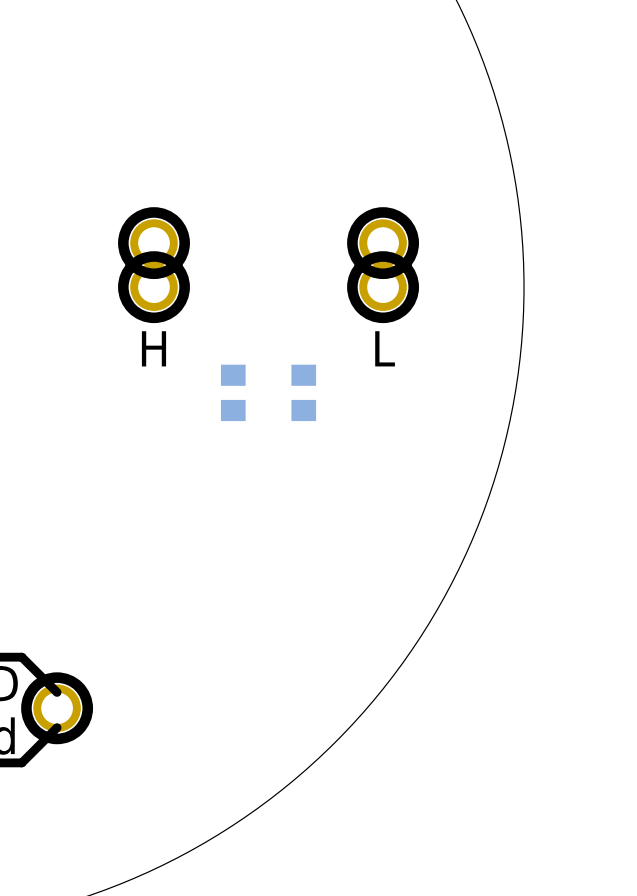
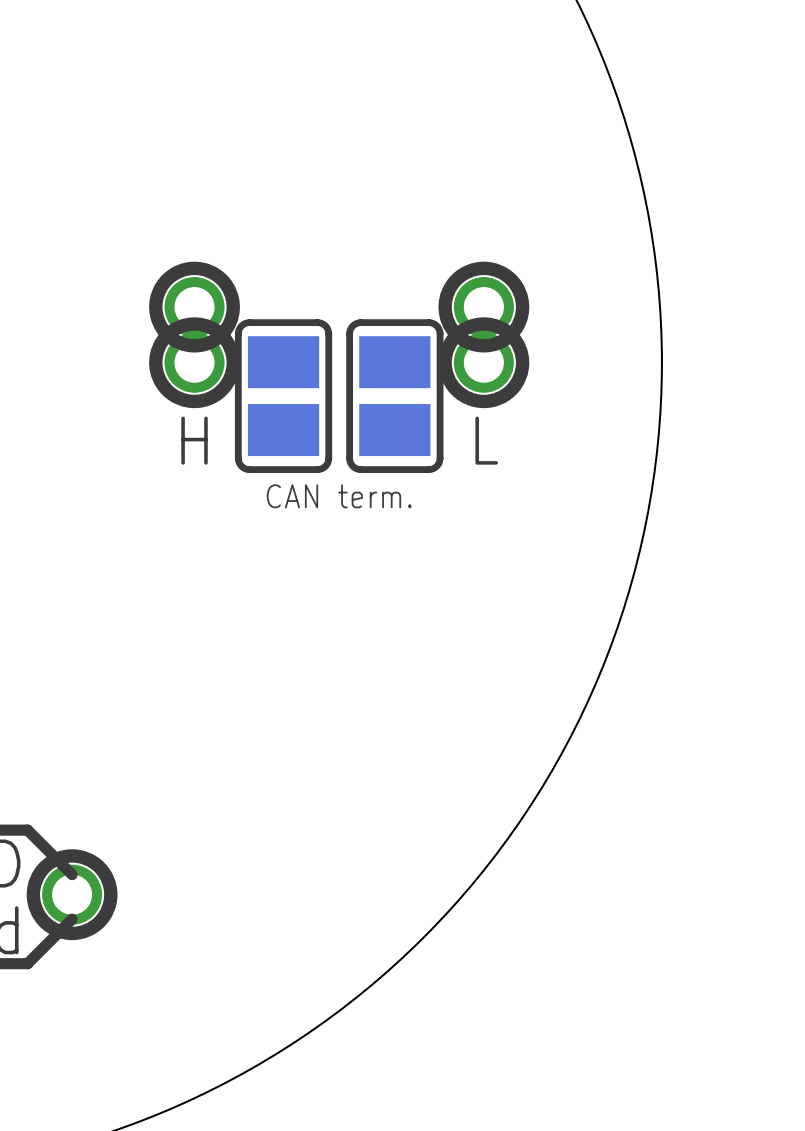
part: none -> (283, 396)
part: none -> (394, 396)
part: (233, 392) -> none
text: none -> CAN term. (339, 496)
part: (303, 392) -> none

